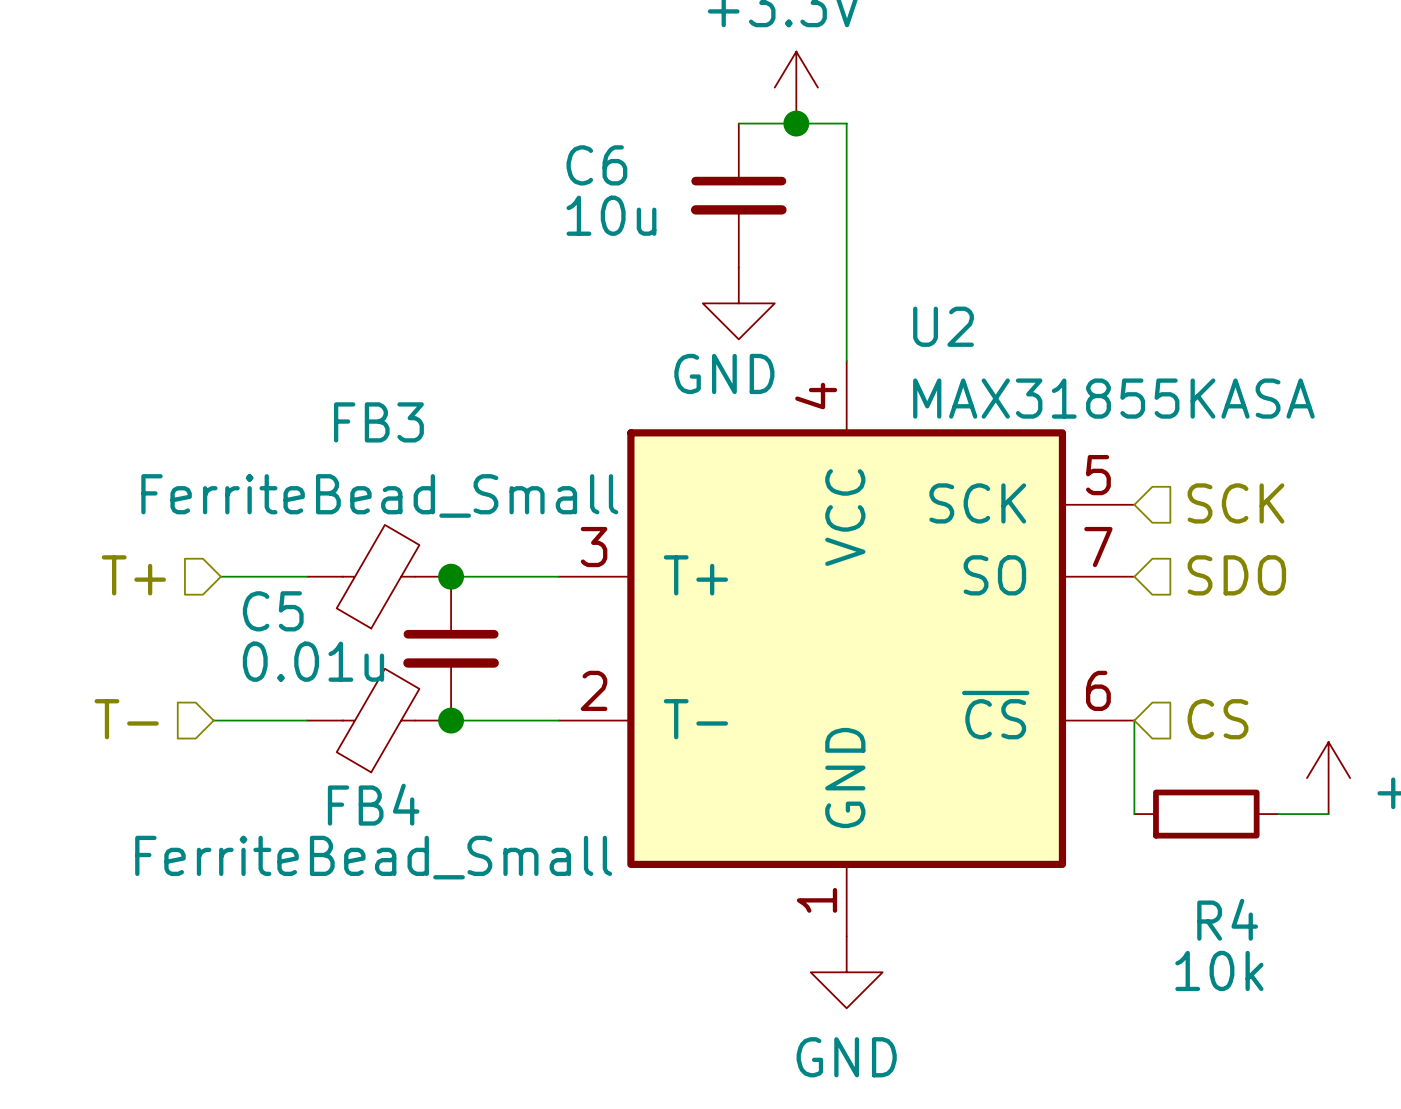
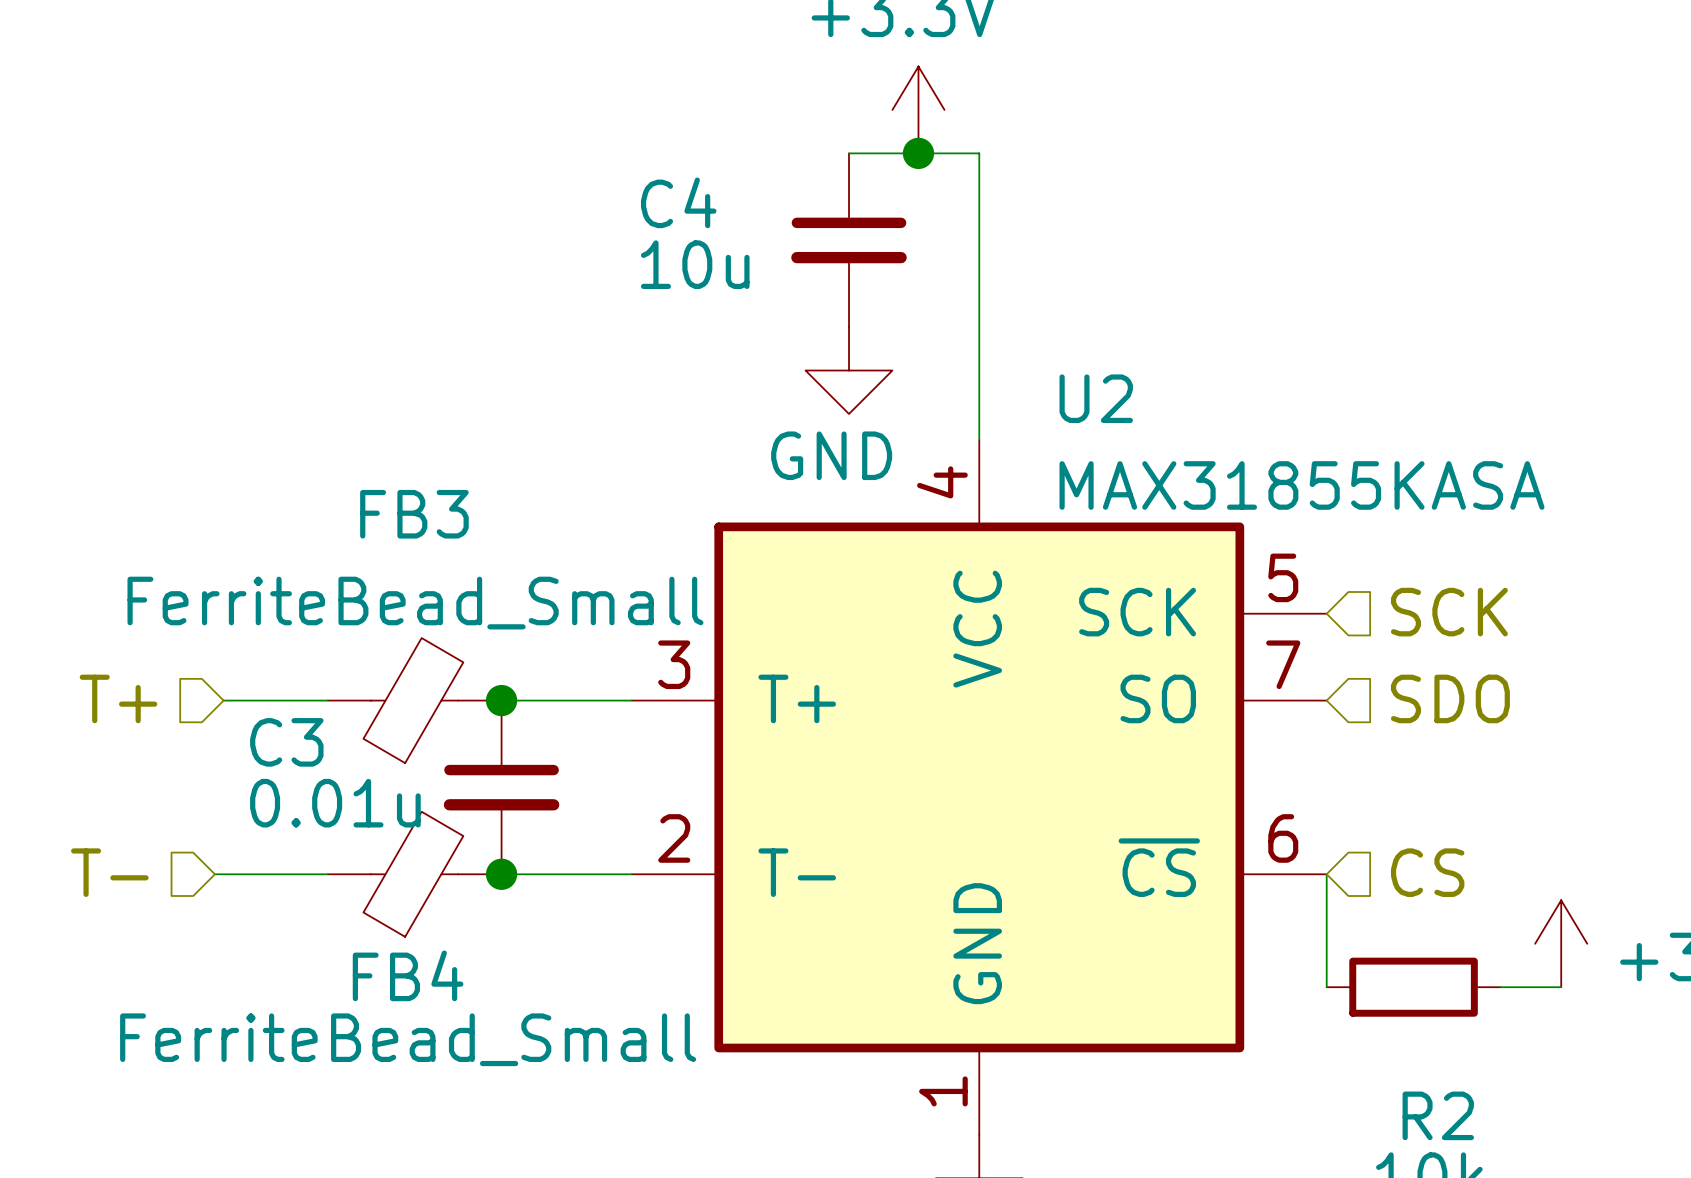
C6 name: C6 (596, 165) -> C4 (678, 202)
C5 name: C5 (273, 611) -> C3 (286, 742)
R4 name: R4 (1227, 919) -> R2 (1438, 1115)

